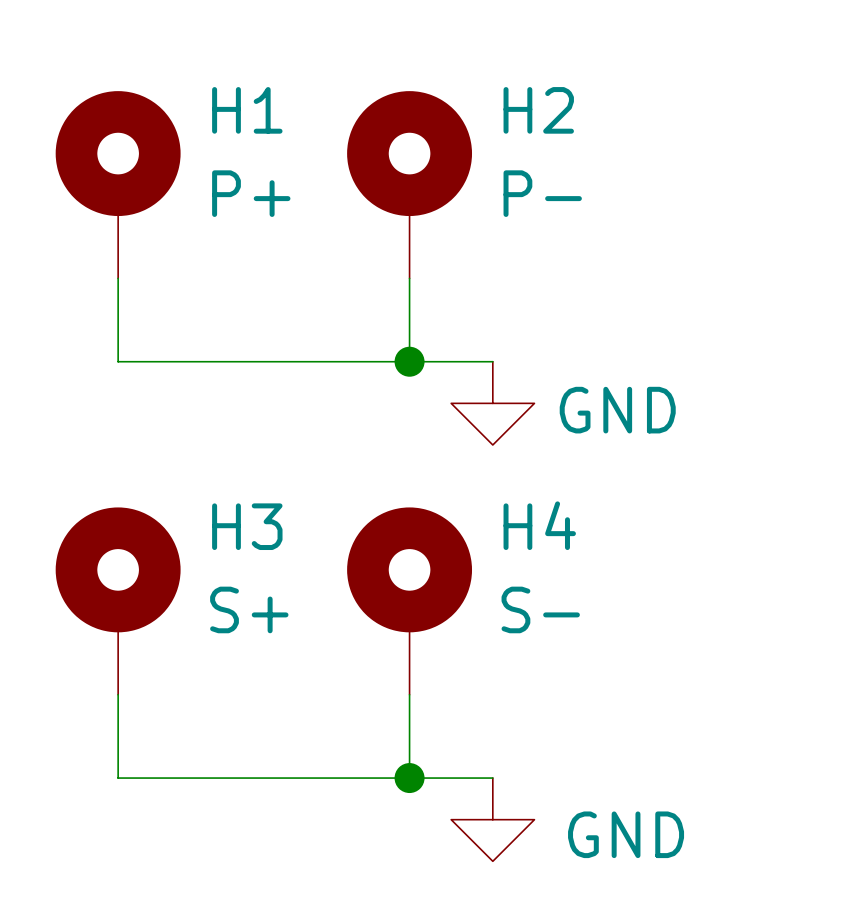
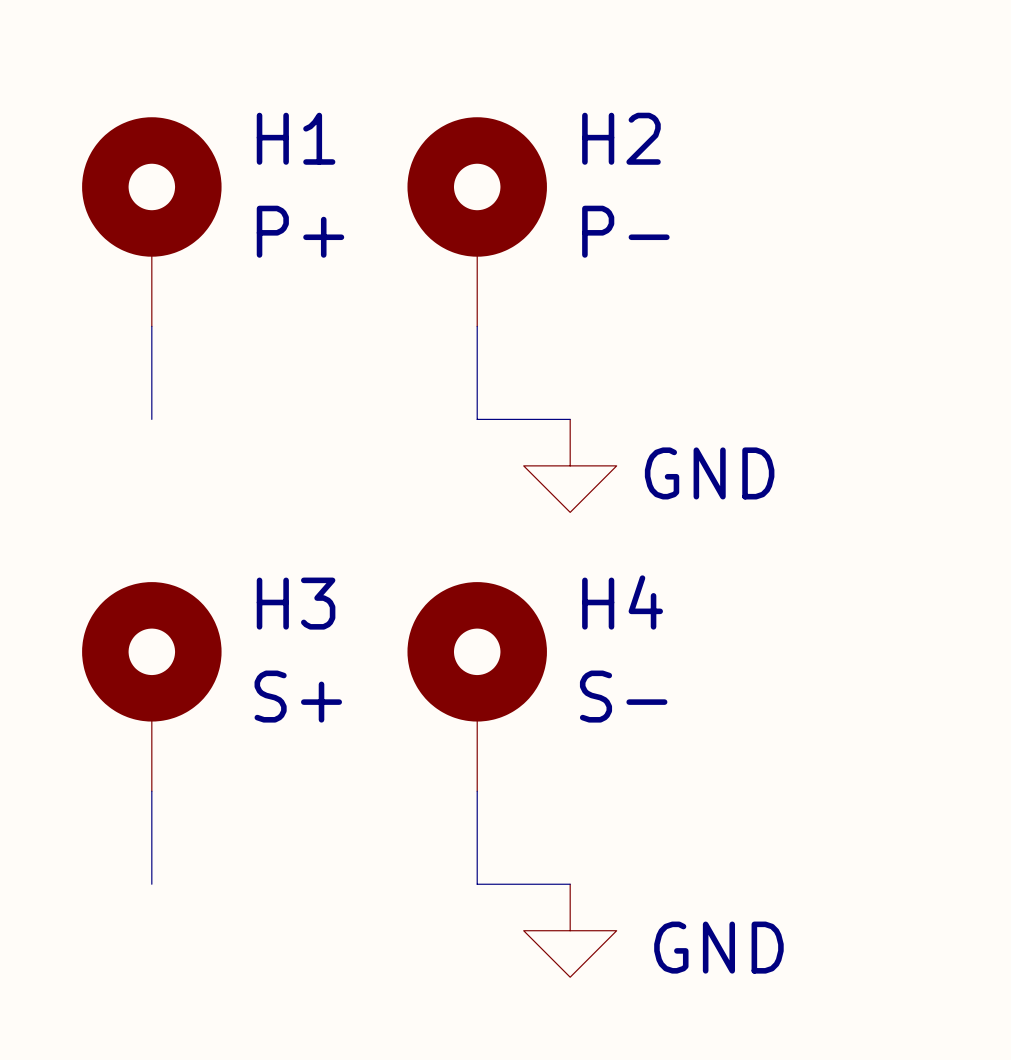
wire: (118, 361) (409, 361) -> none
junction: (409, 361) -> none
wire: (118, 778) (409, 778) -> none
junction: (409, 778) -> none

